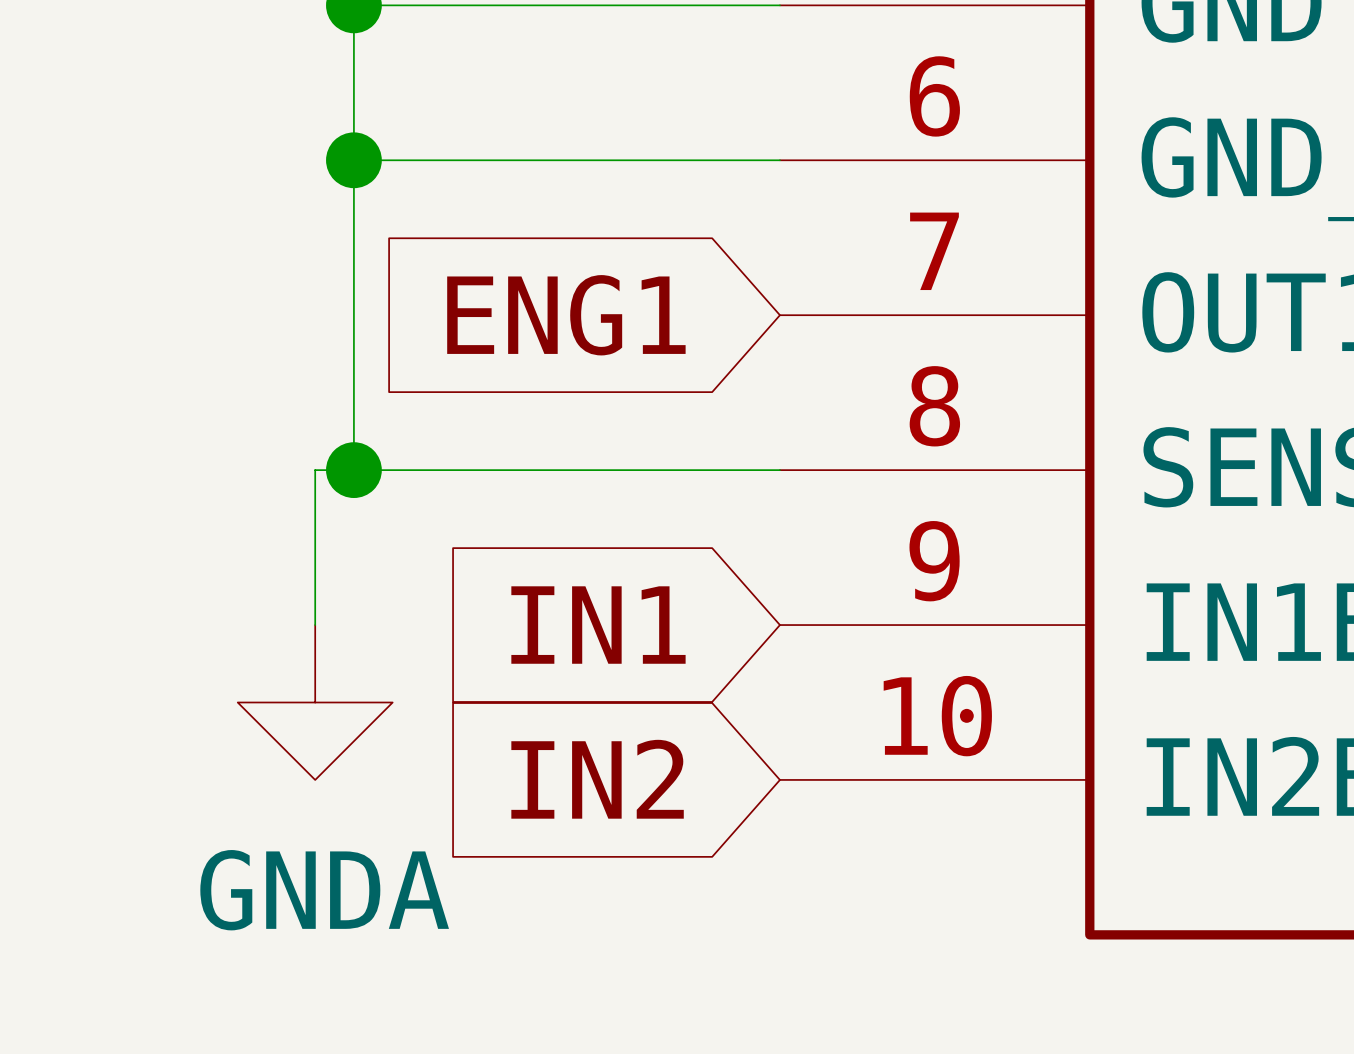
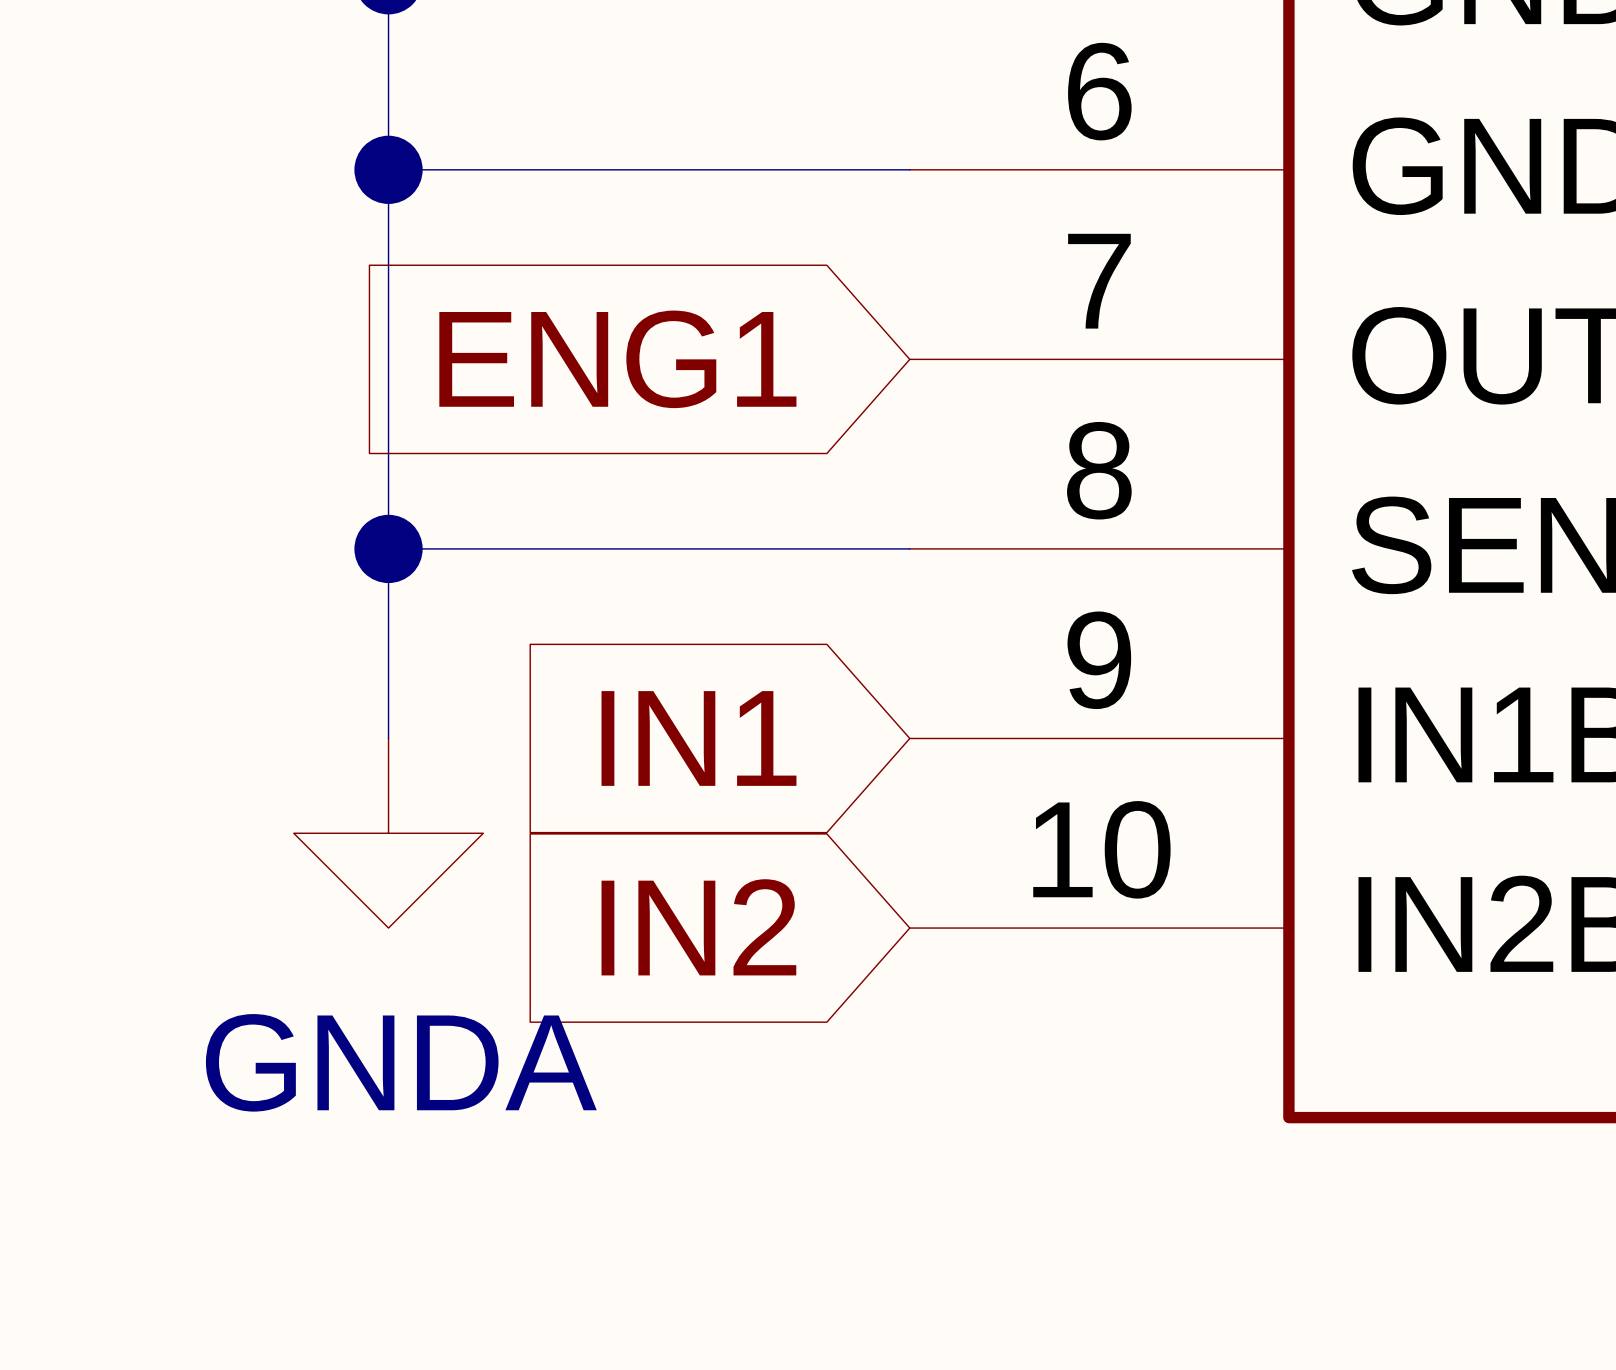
wire: (353, 470) (315, 470) (315, 625) -> (388, 548) (388, 738)
power symbol position: GNDA (315, 702) -> GNDA (388, 833)

